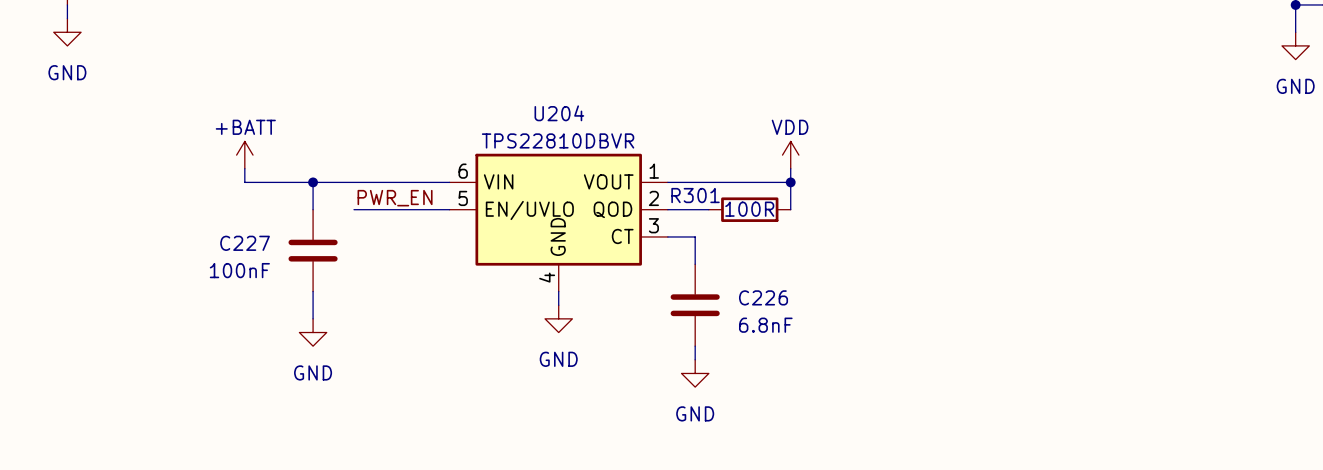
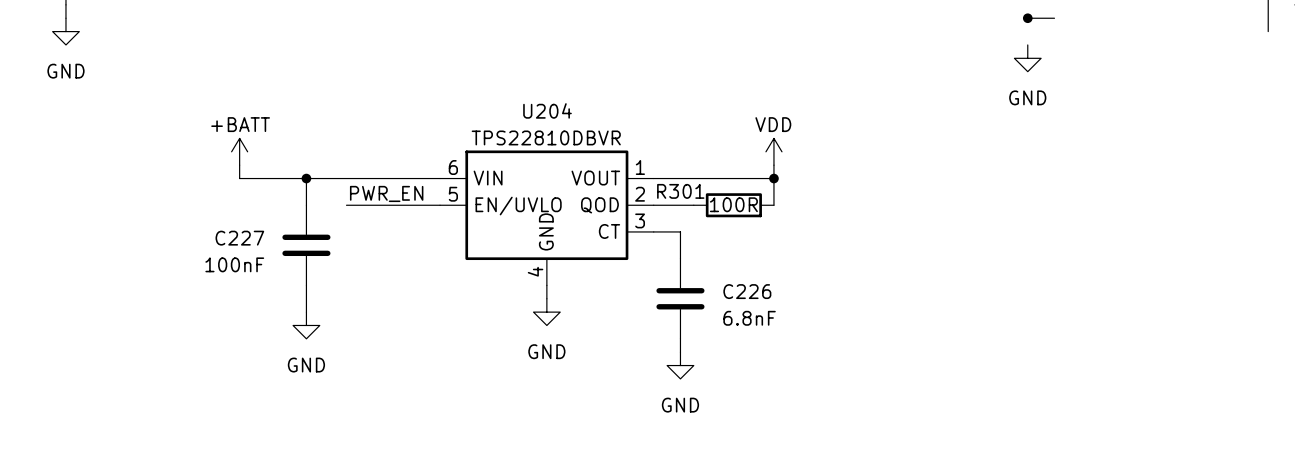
wire: (1295, 4) (1322, 4) -> (1027, 18) (1054, 18)
junction: (1295, 4) -> none
junction: none -> (1027, 18)
power symbol: GND (1295, 45) -> none
power symbol: none -> GND (1027, 58)

